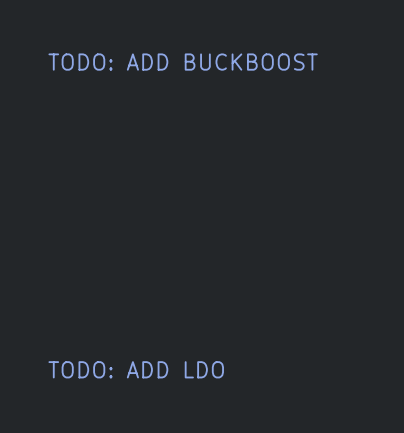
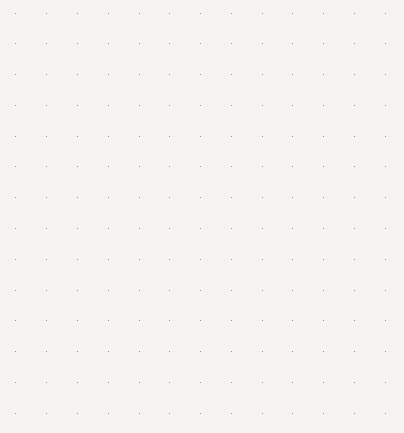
text: TODO: ADD BUCKBOOST (183, 62) -> none
text: TODO: ADD LDO (136, 369) -> none

